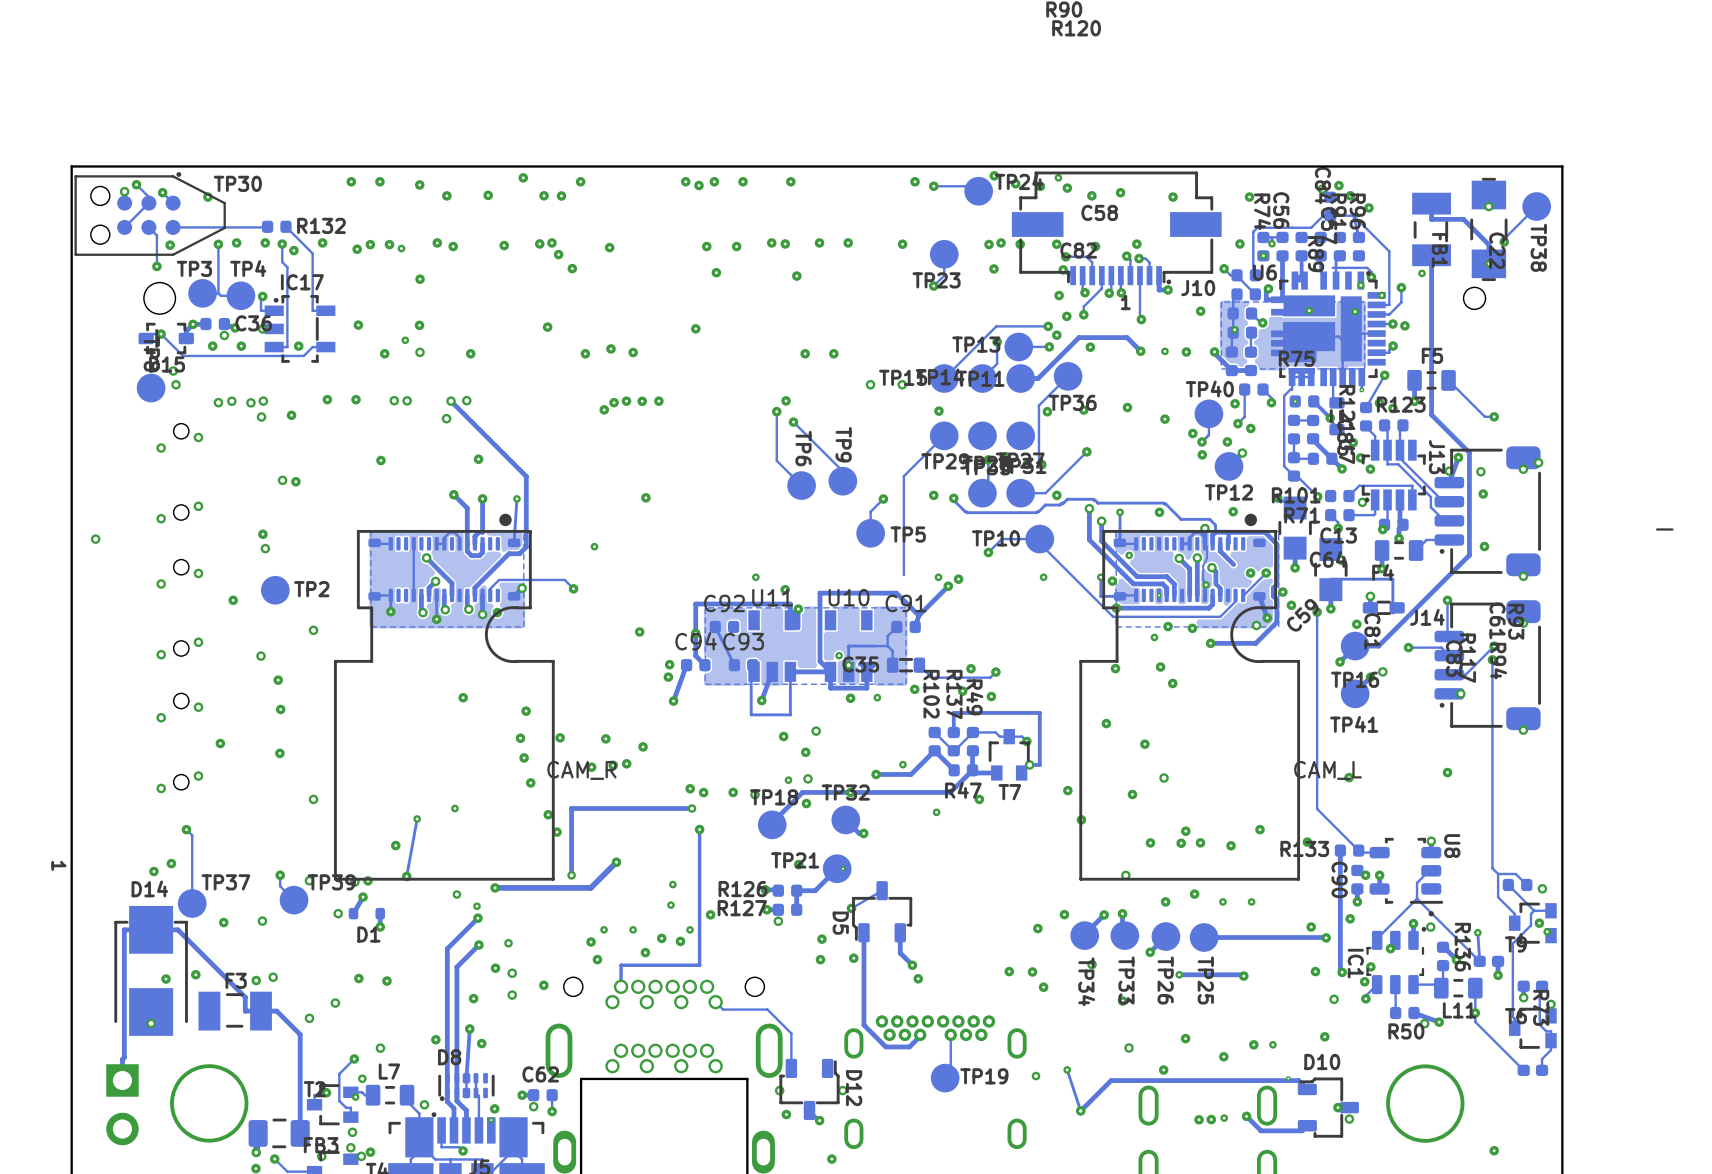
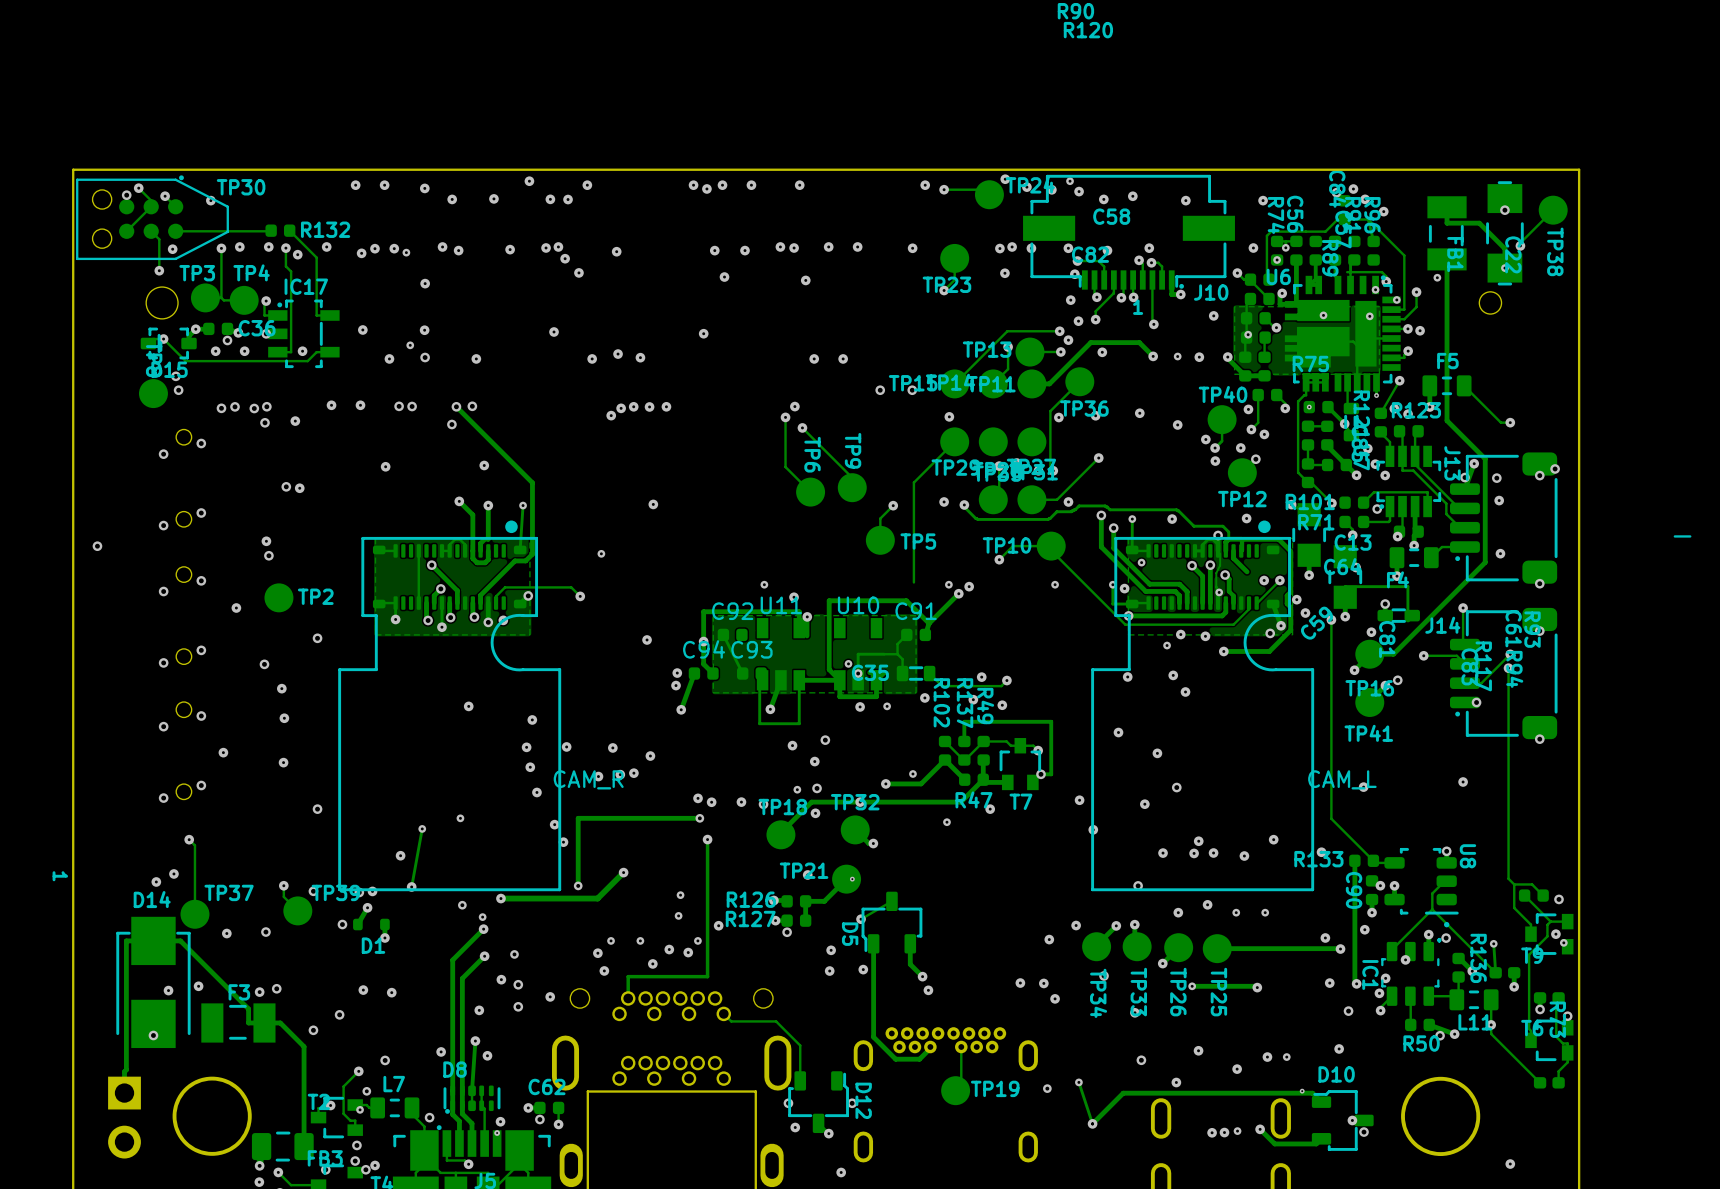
via: (1159, 595) -> none

